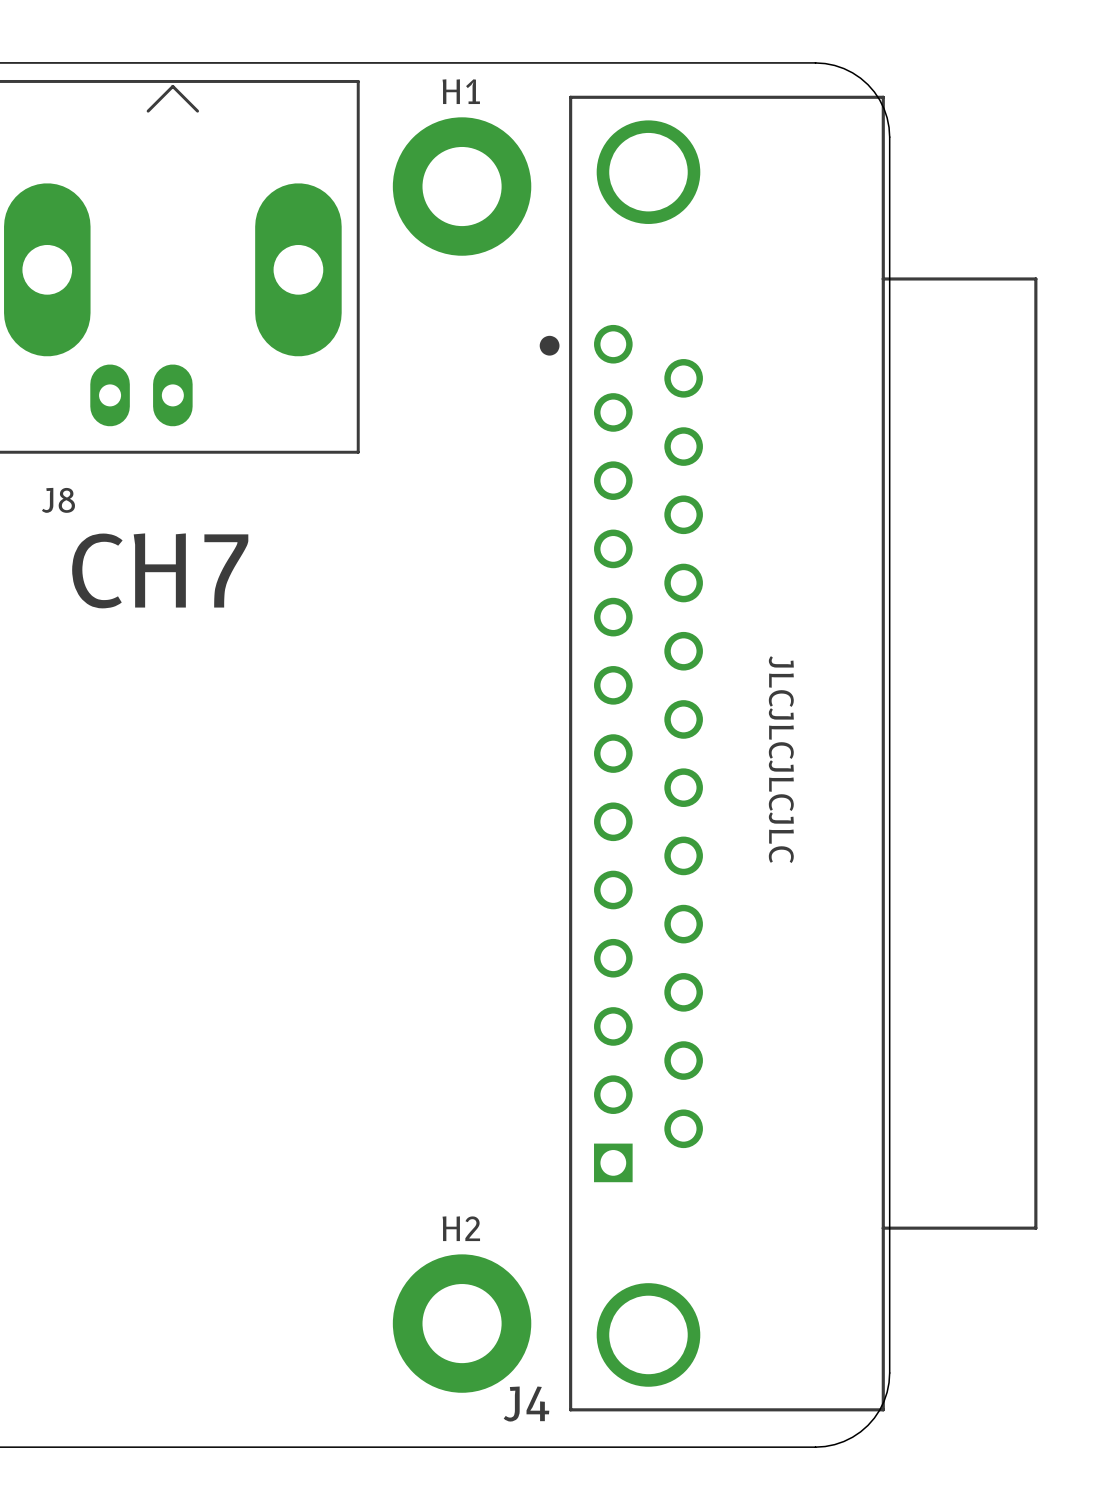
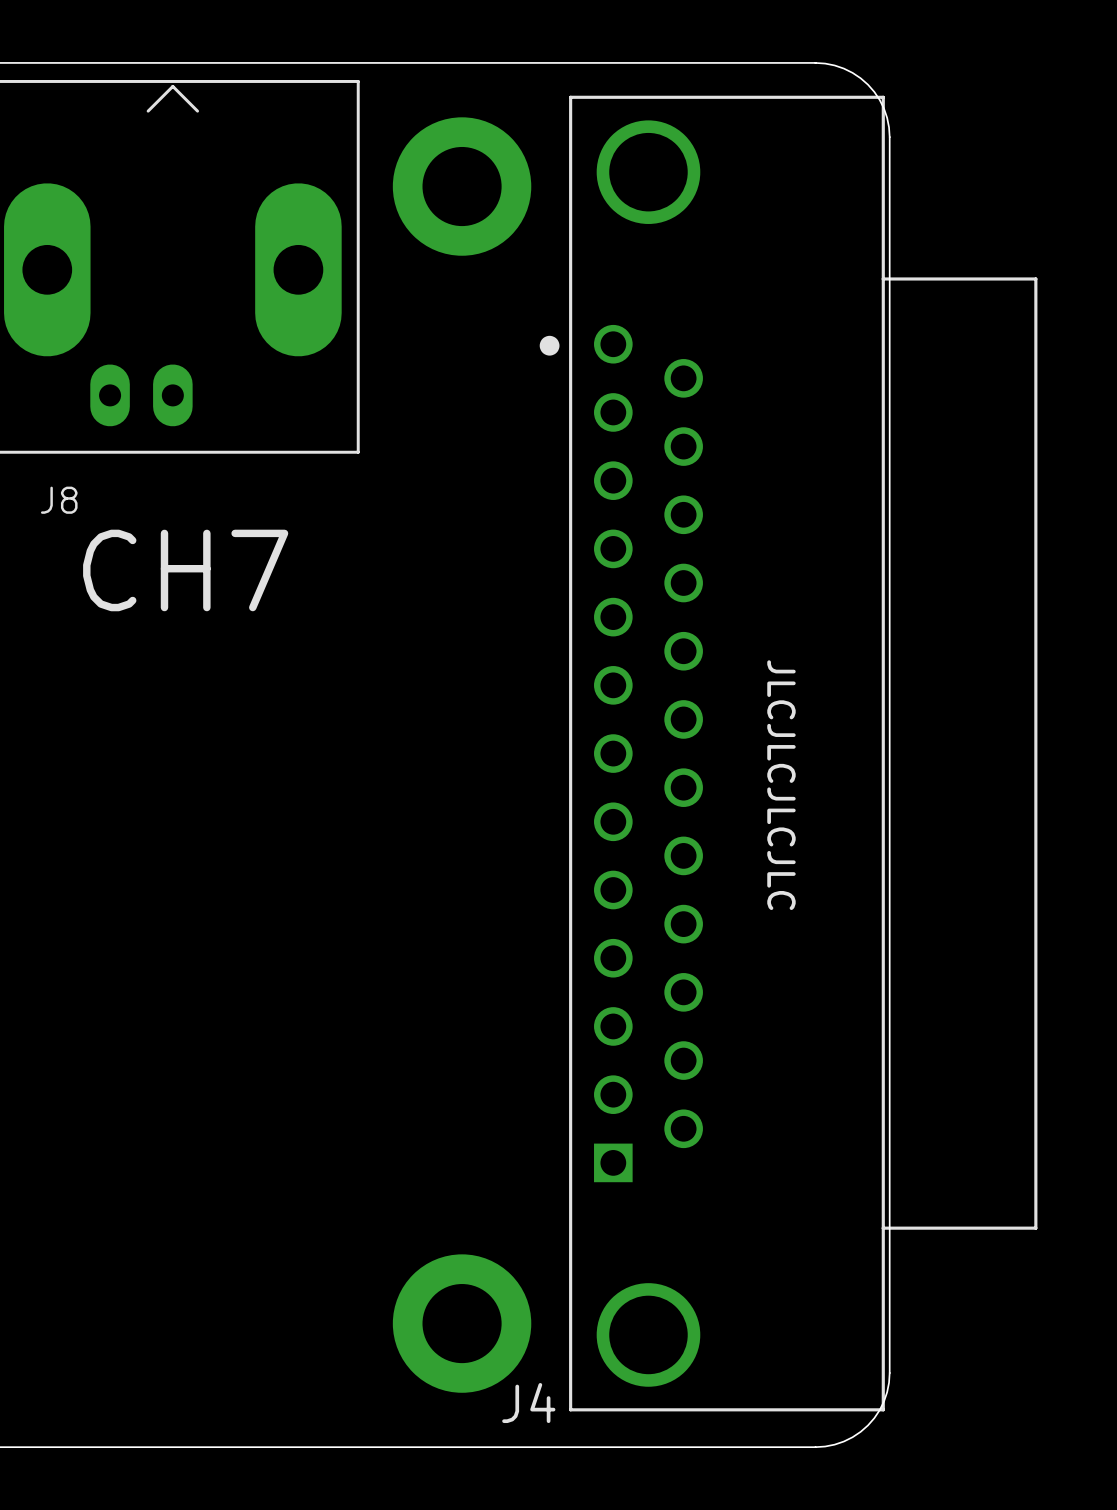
H1 name: H1 (461, 91) -> none
H2 name: H2 (461, 1228) -> none

